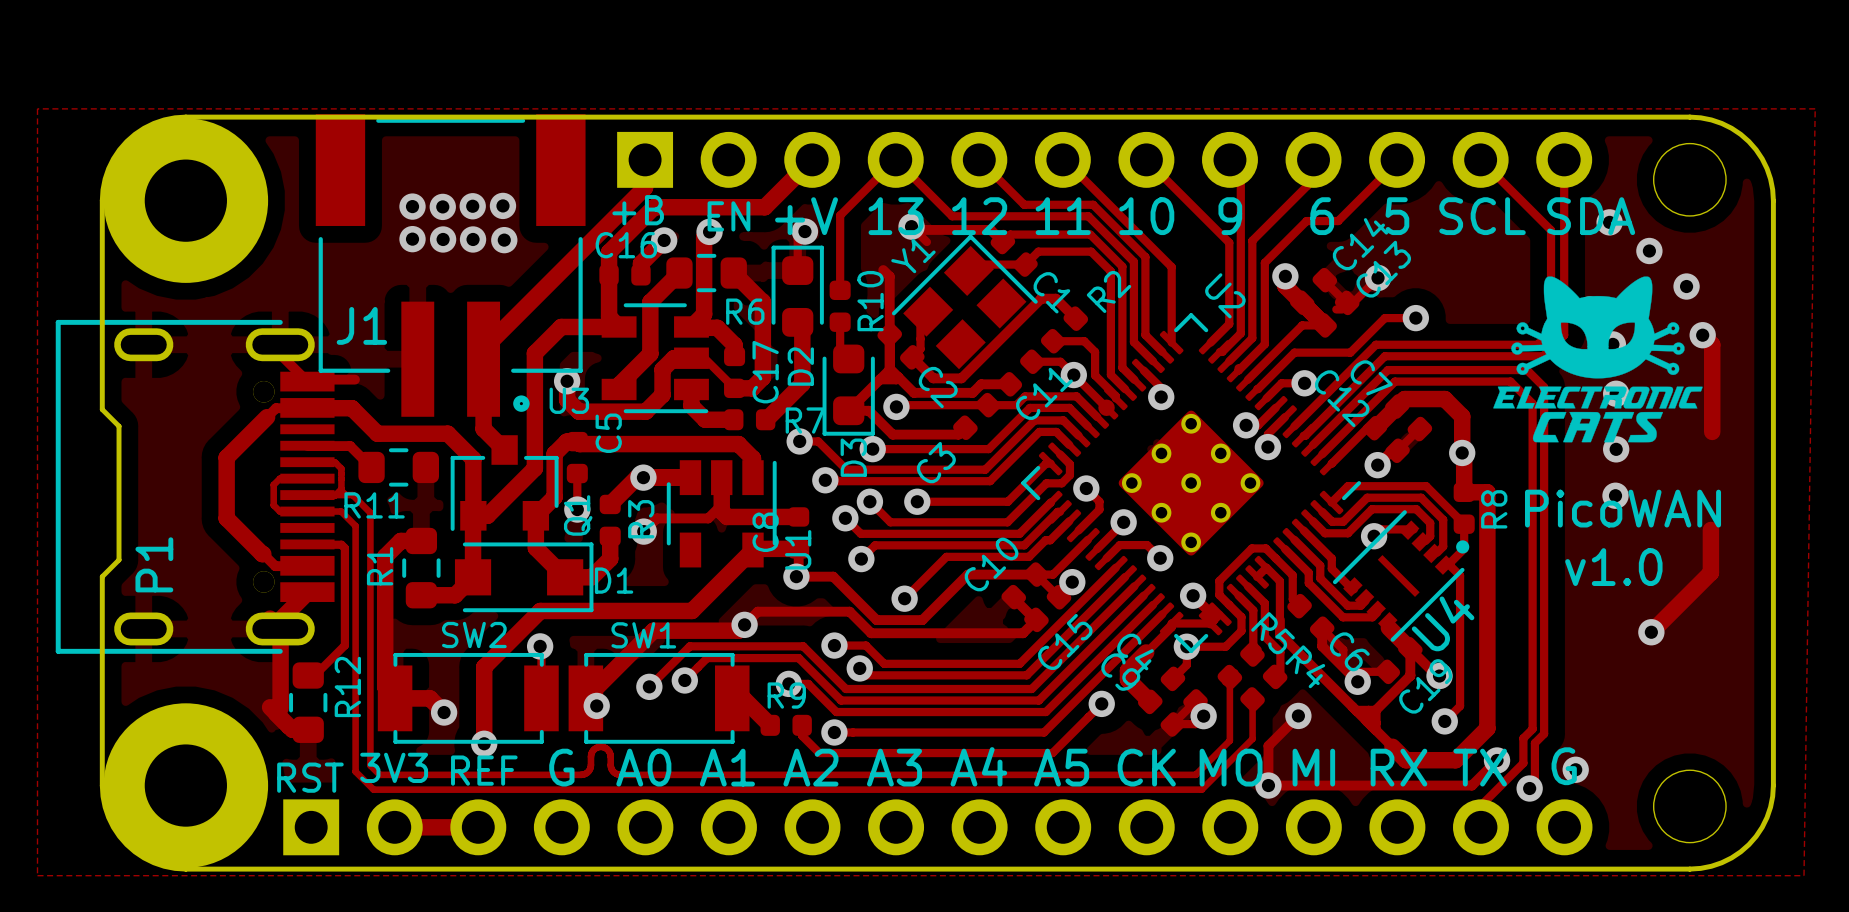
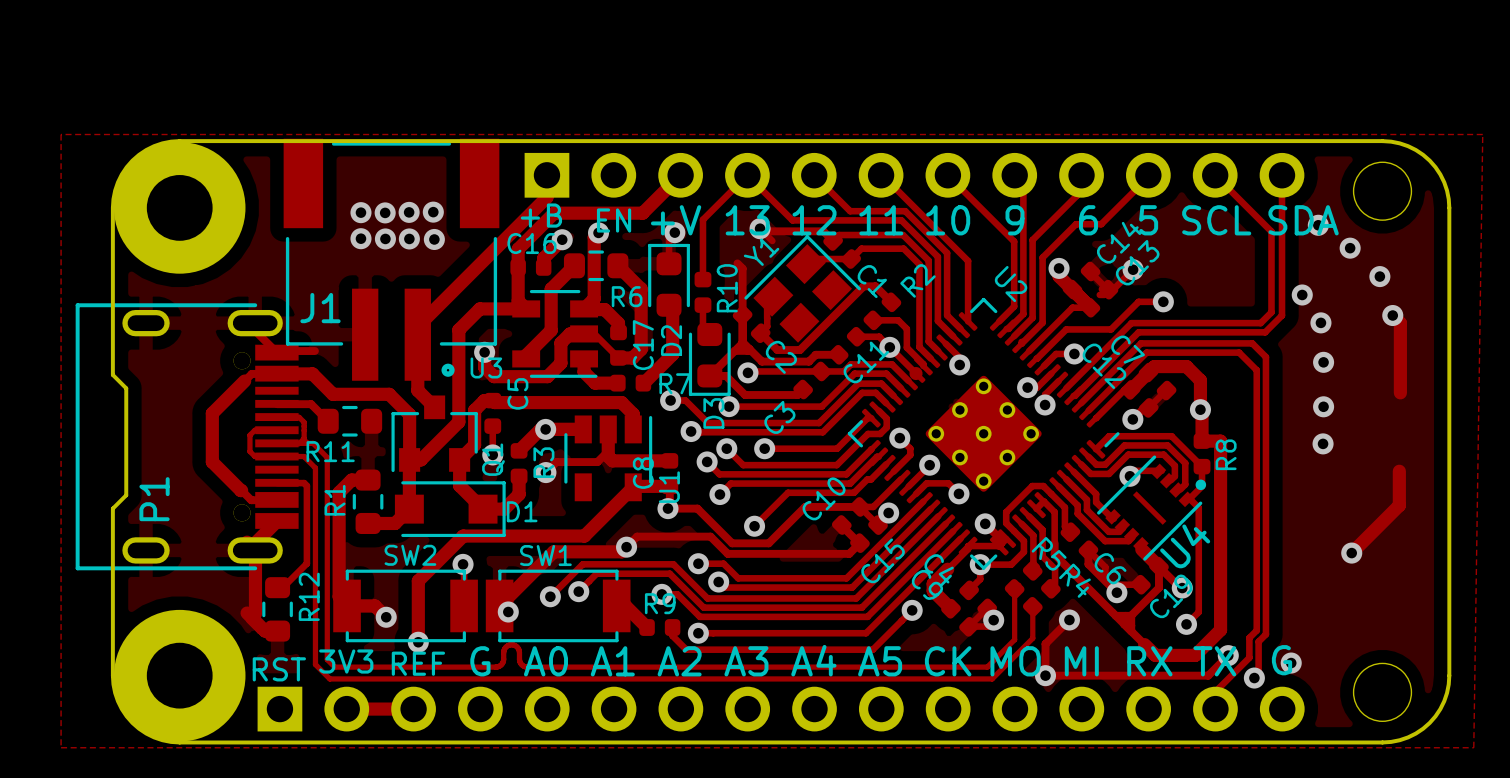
drawing: [1493, 276, 1703, 443] -> none
text: PicoWAN (1623, 508) -> none
text: v1.0 (1613, 567) -> none

